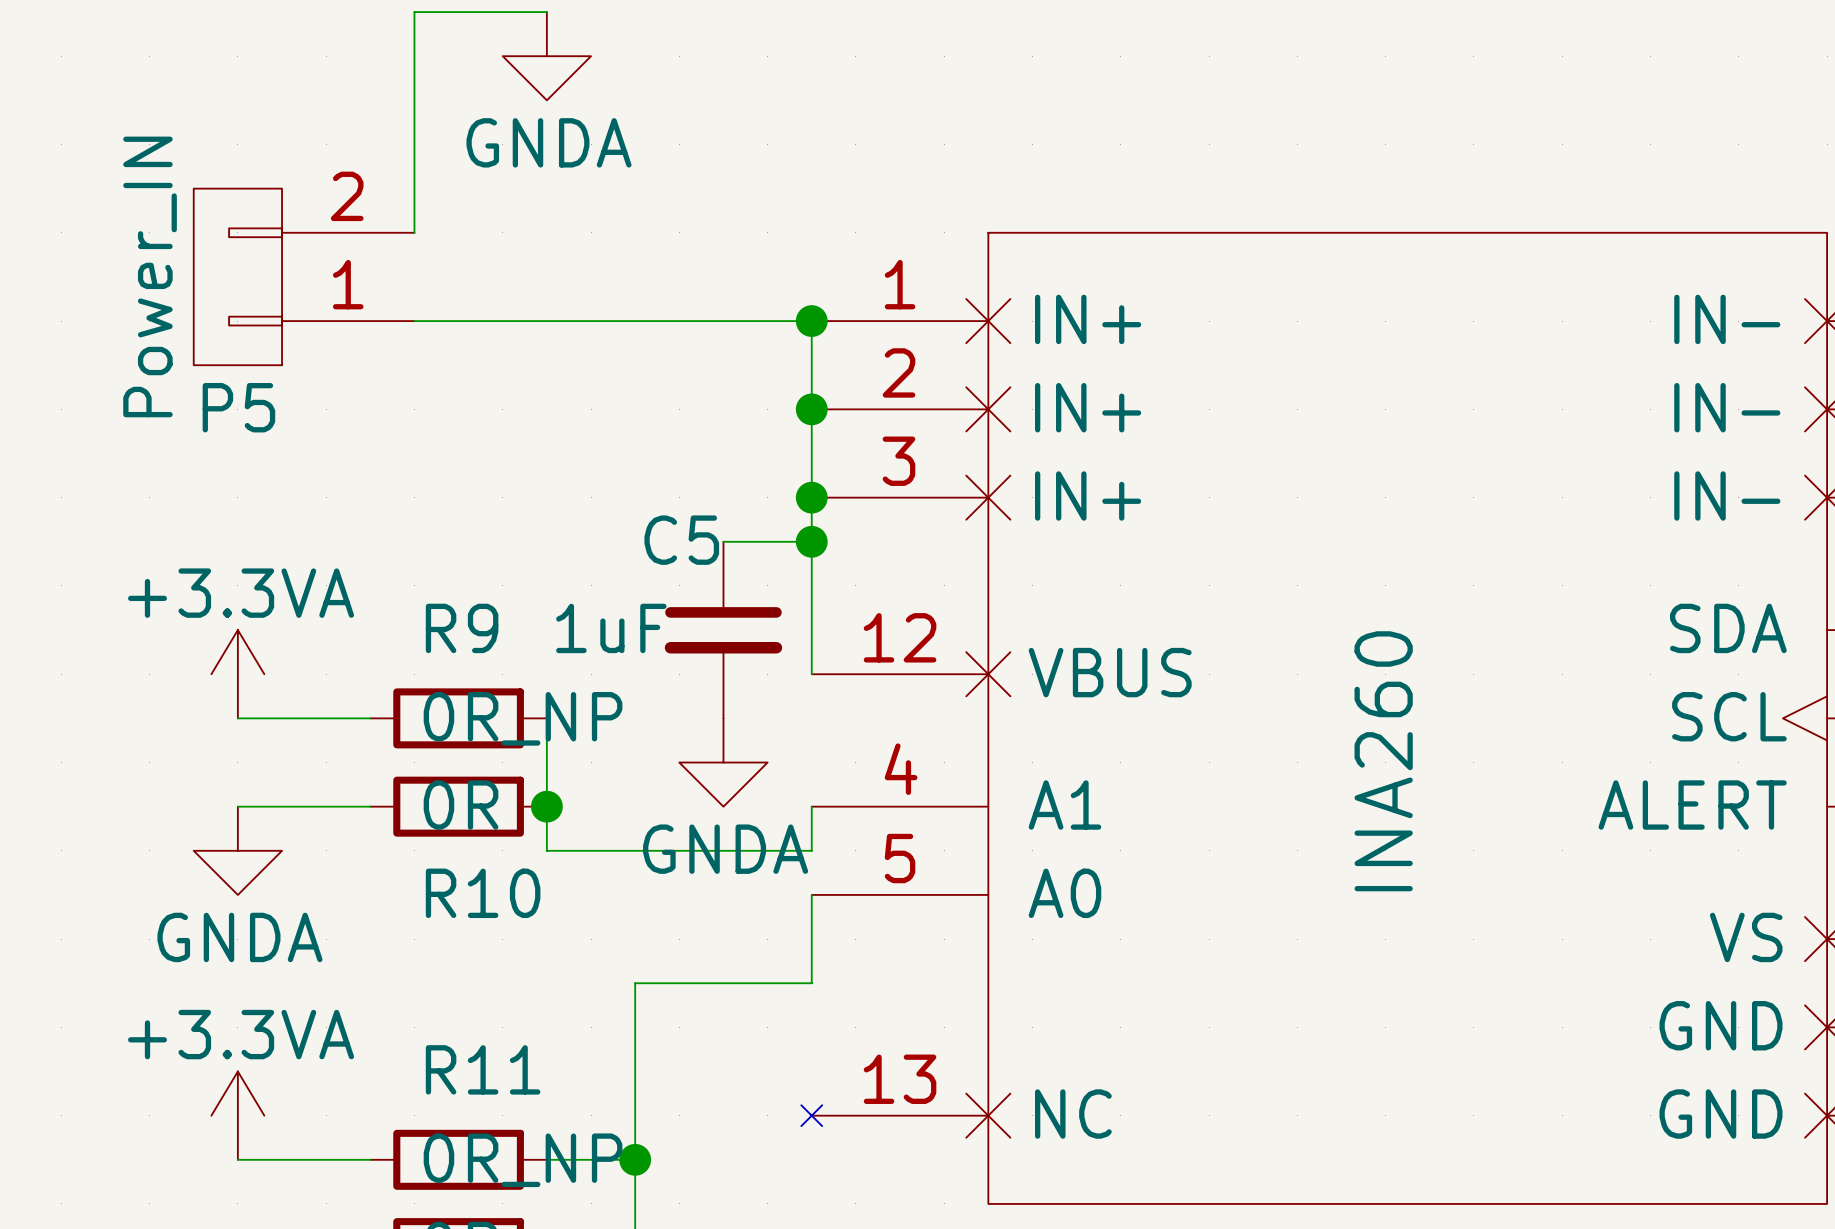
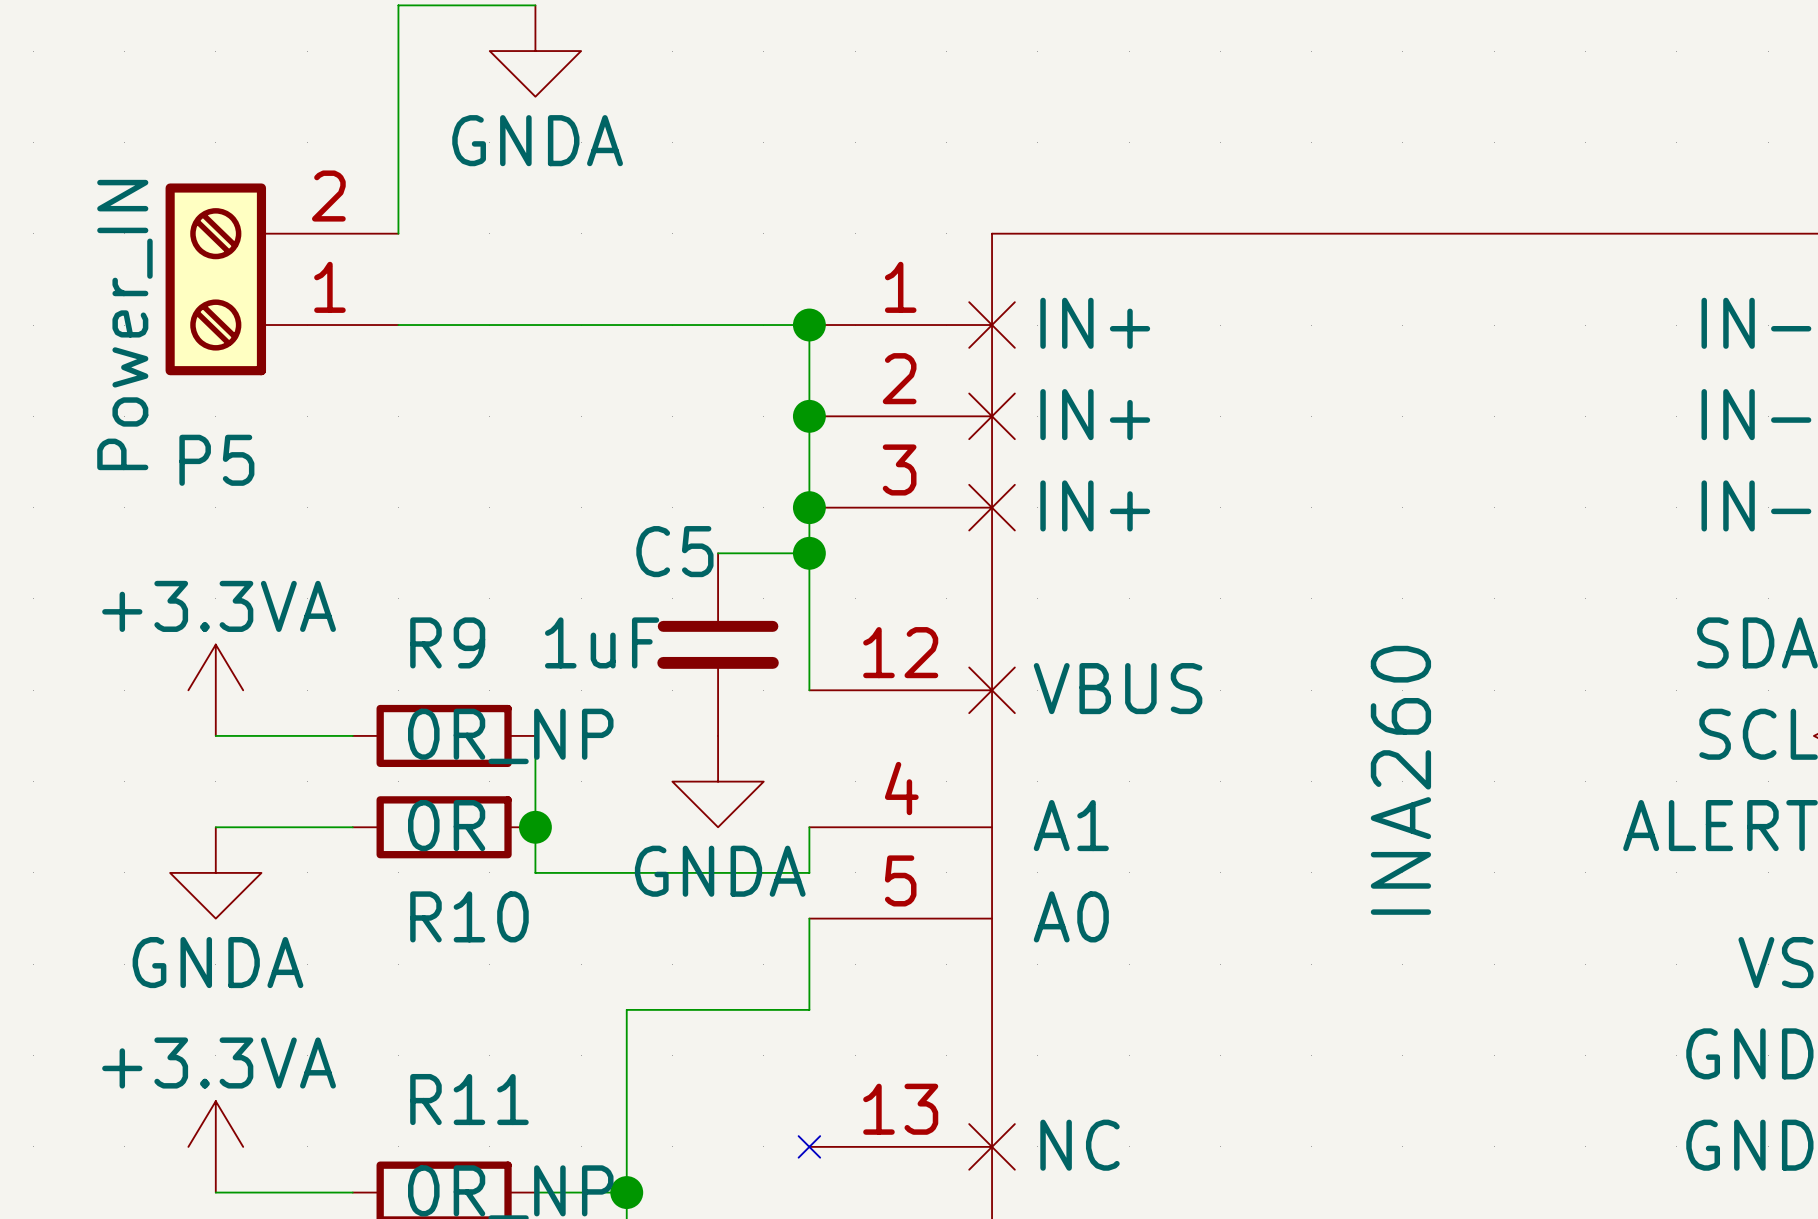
P5 symbol: [193, 188, 415, 366] -> [165, 183, 399, 376]

